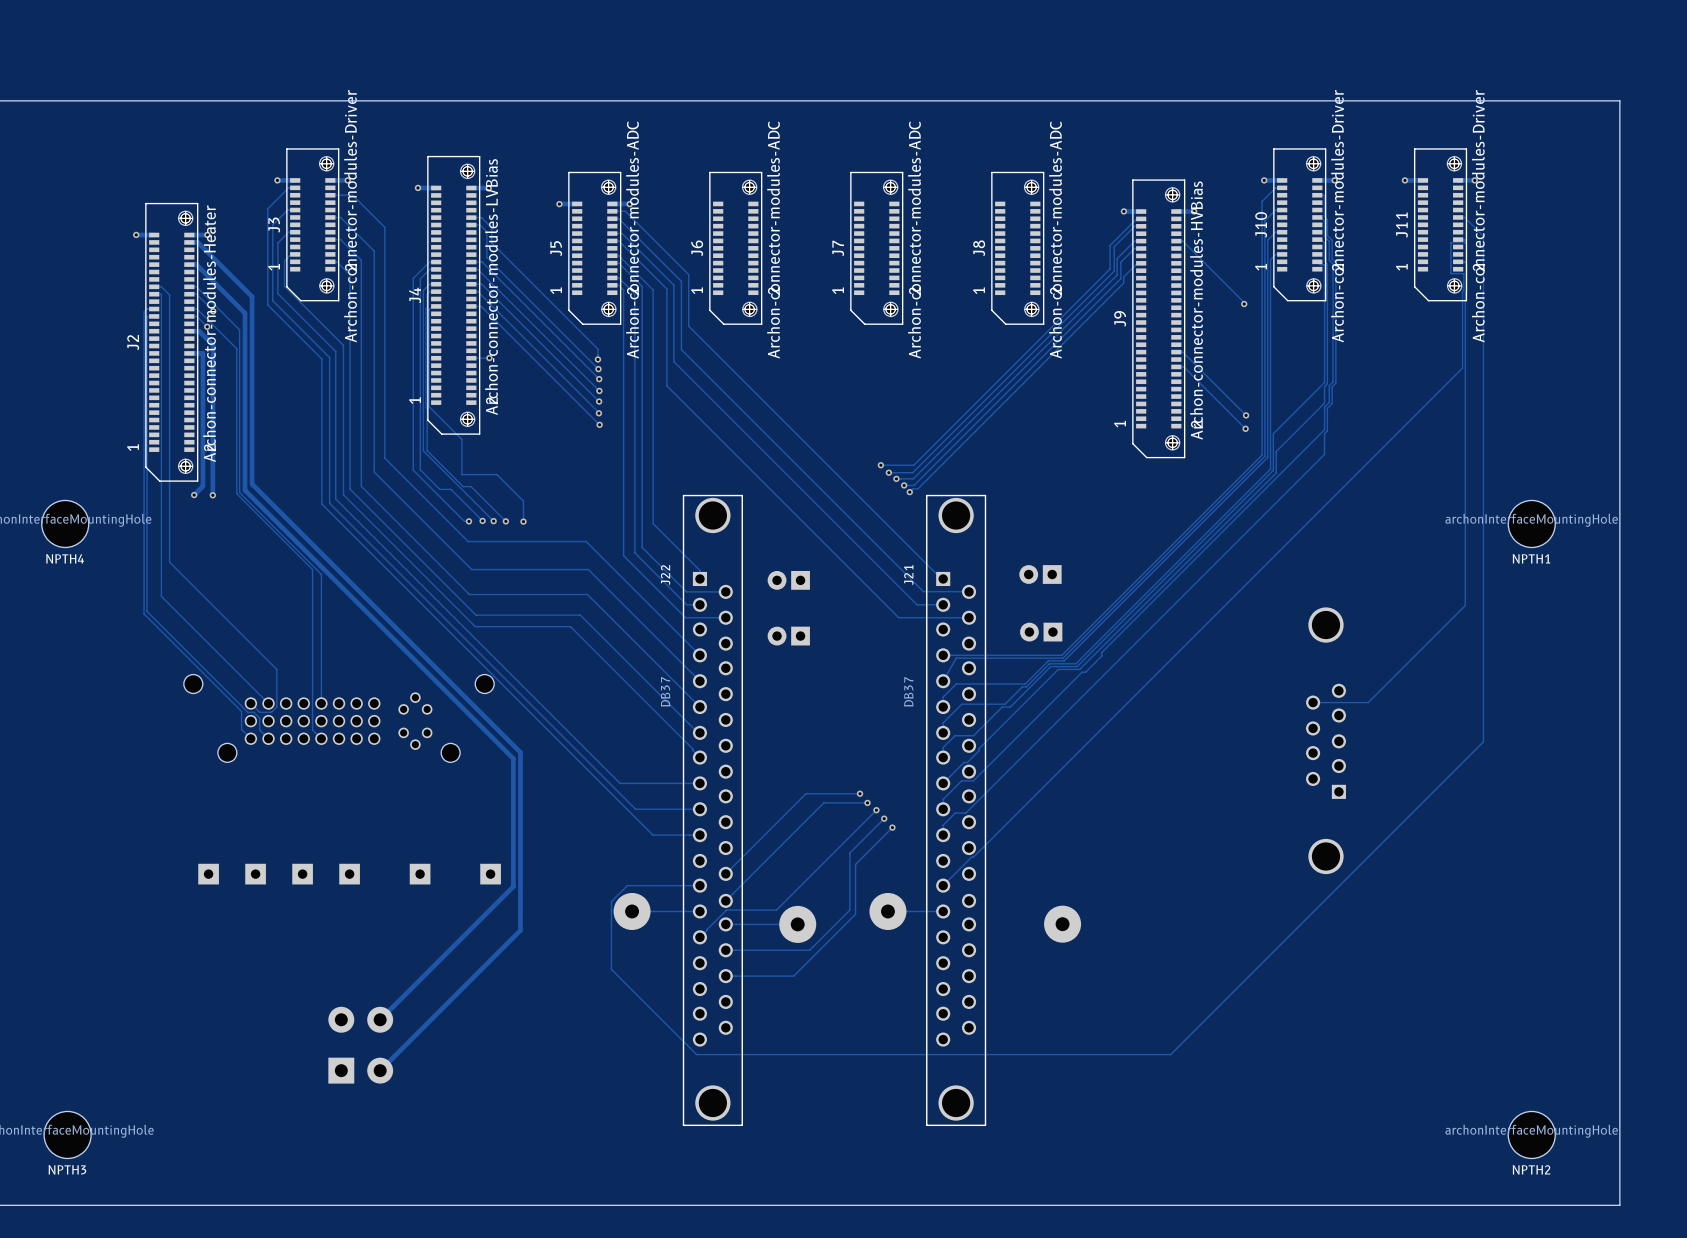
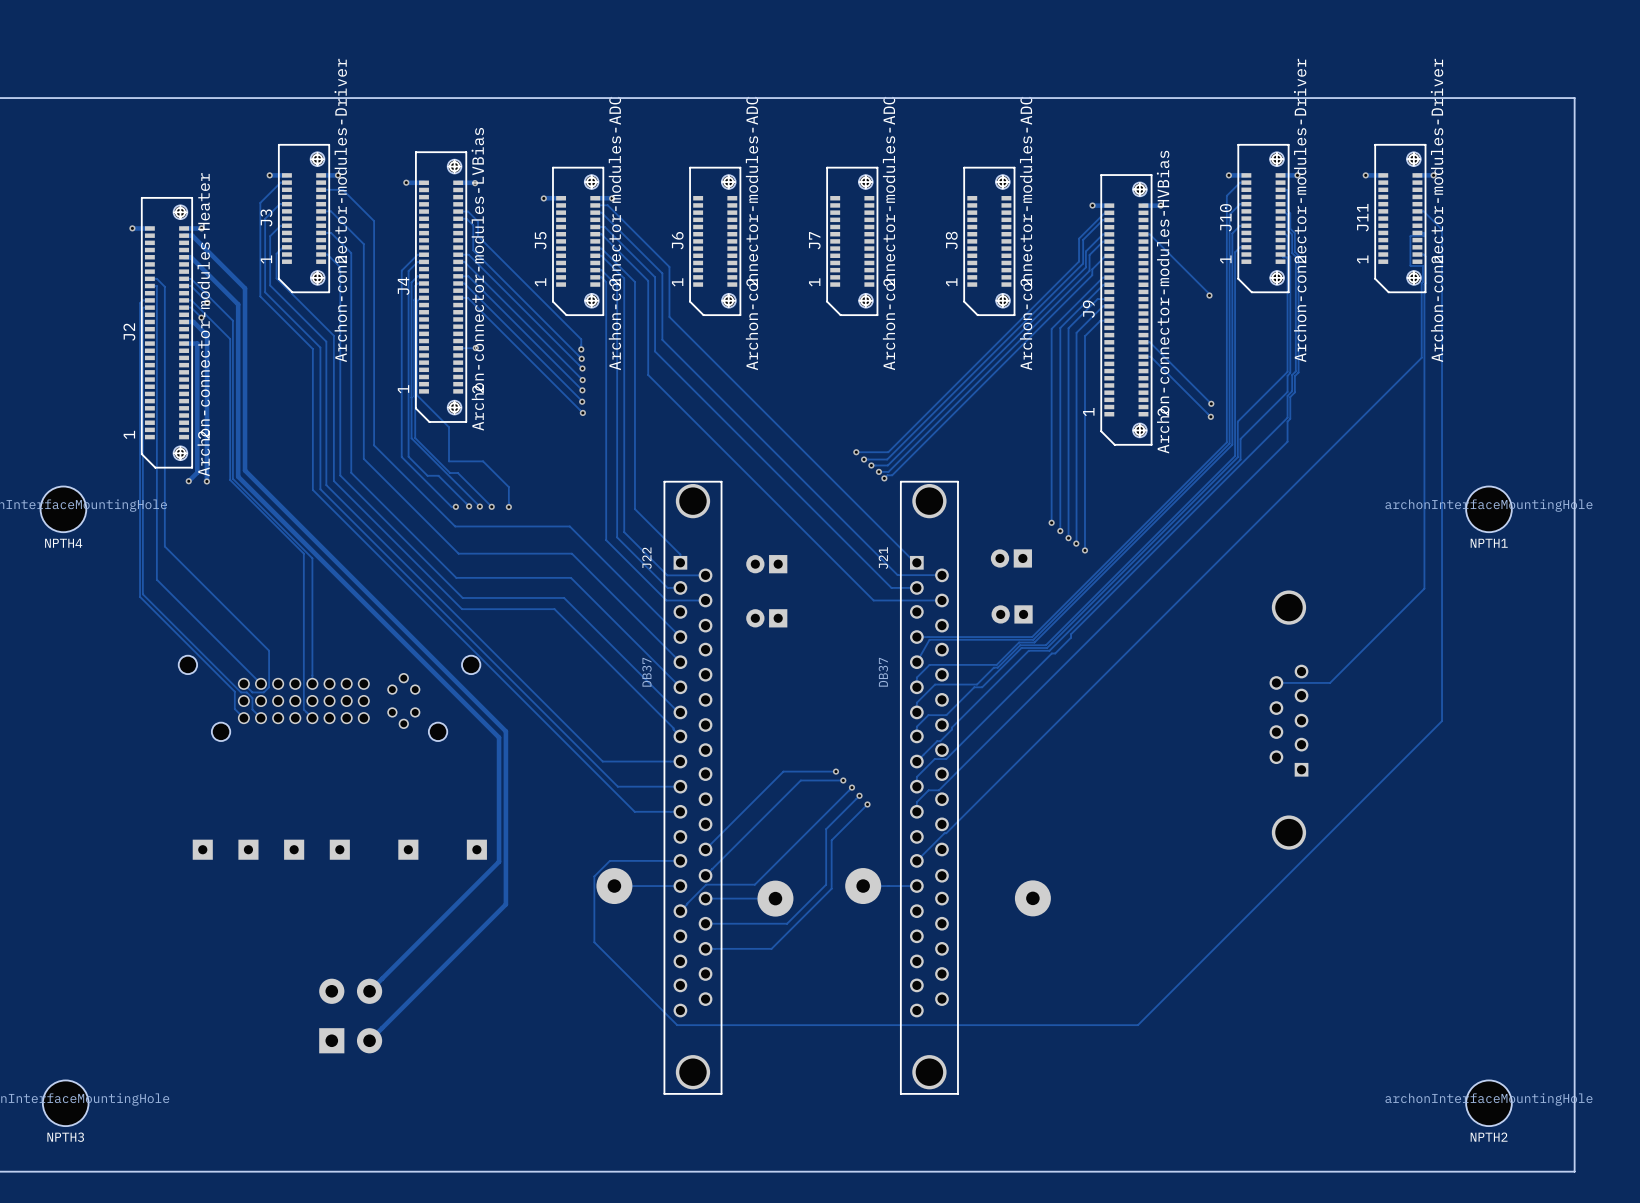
track: none -> (1109, 277) (1103, 277) (1051, 328) (1051, 522)
track: none -> (1109, 284) (1103, 284) (1060, 327) (1060, 531)
track: none -> (1109, 299) (1097, 299) (1068, 328) (1068, 538)
track: none -> (1109, 306) (1103, 306) (1076, 332) (1076, 543)
track: none -> (1109, 320) (1100, 320) (1084, 336) (1084, 550)
via: none -> (1051, 522)
via: none -> (1060, 531)
via: none -> (1068, 538)
via: none -> (1076, 543)
via: none -> (1084, 550)

